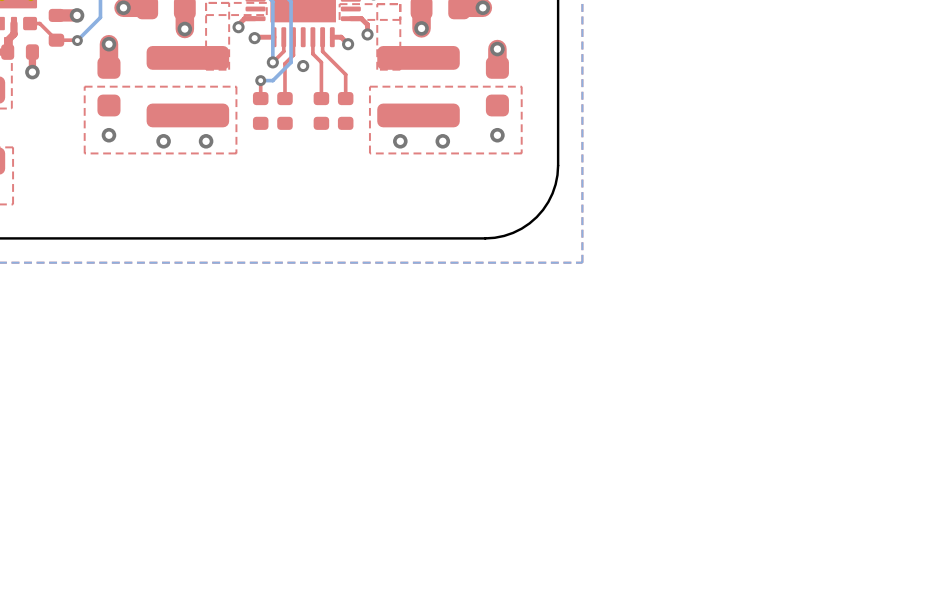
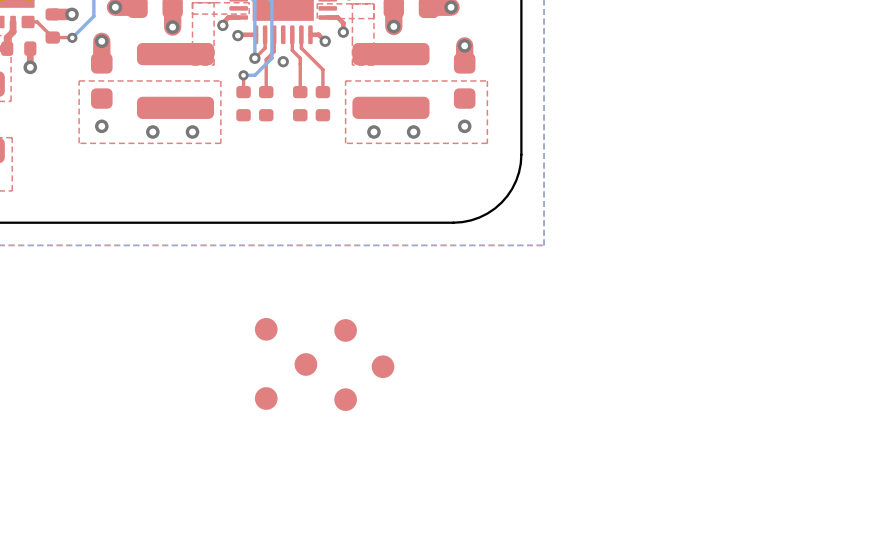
part: none -> (266, 329)
part: none -> (345, 330)
part: none -> (305, 364)
part: none -> (383, 366)
part: none -> (266, 398)
part: none -> (345, 399)

